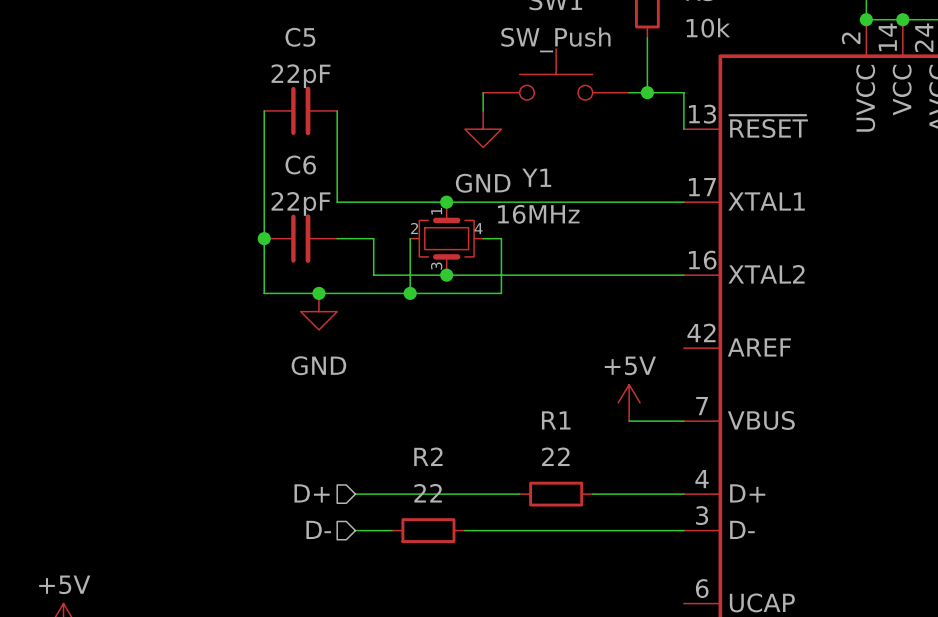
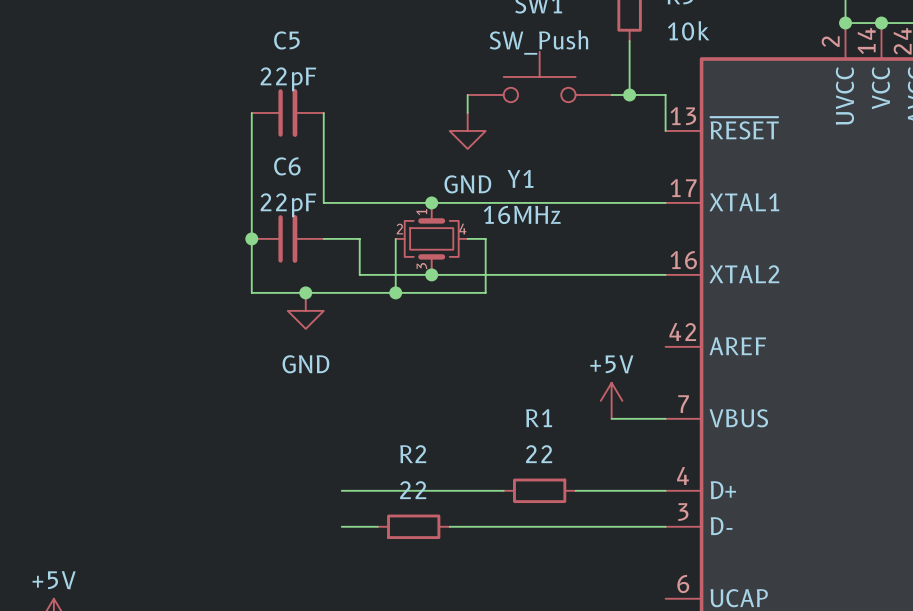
hierarchical label: D+ (312, 493) -> none
hierarchical label: D- (318, 529) -> none

